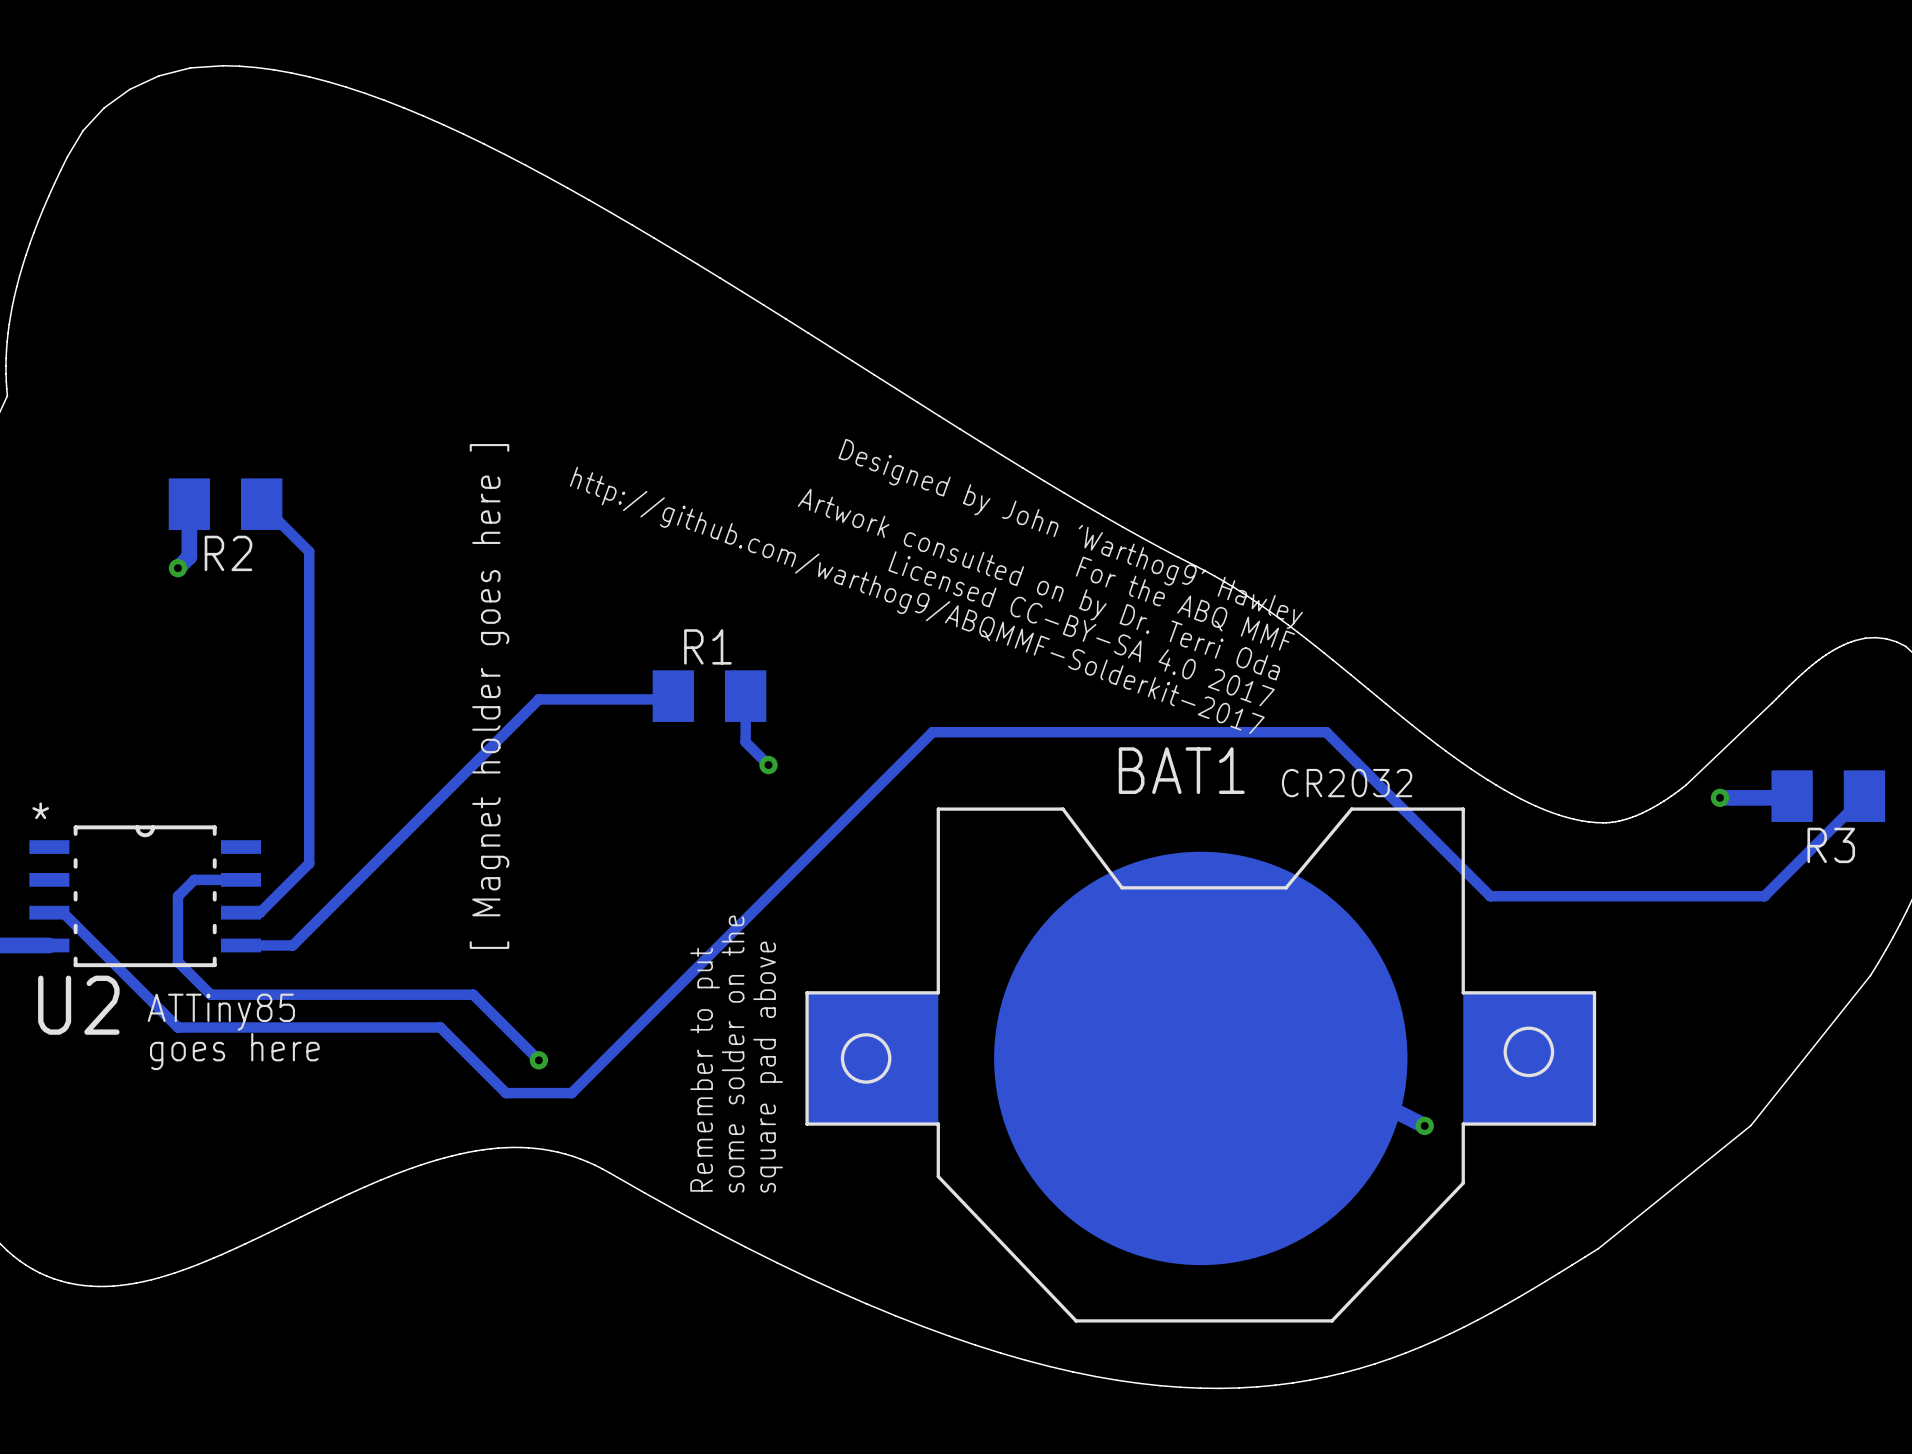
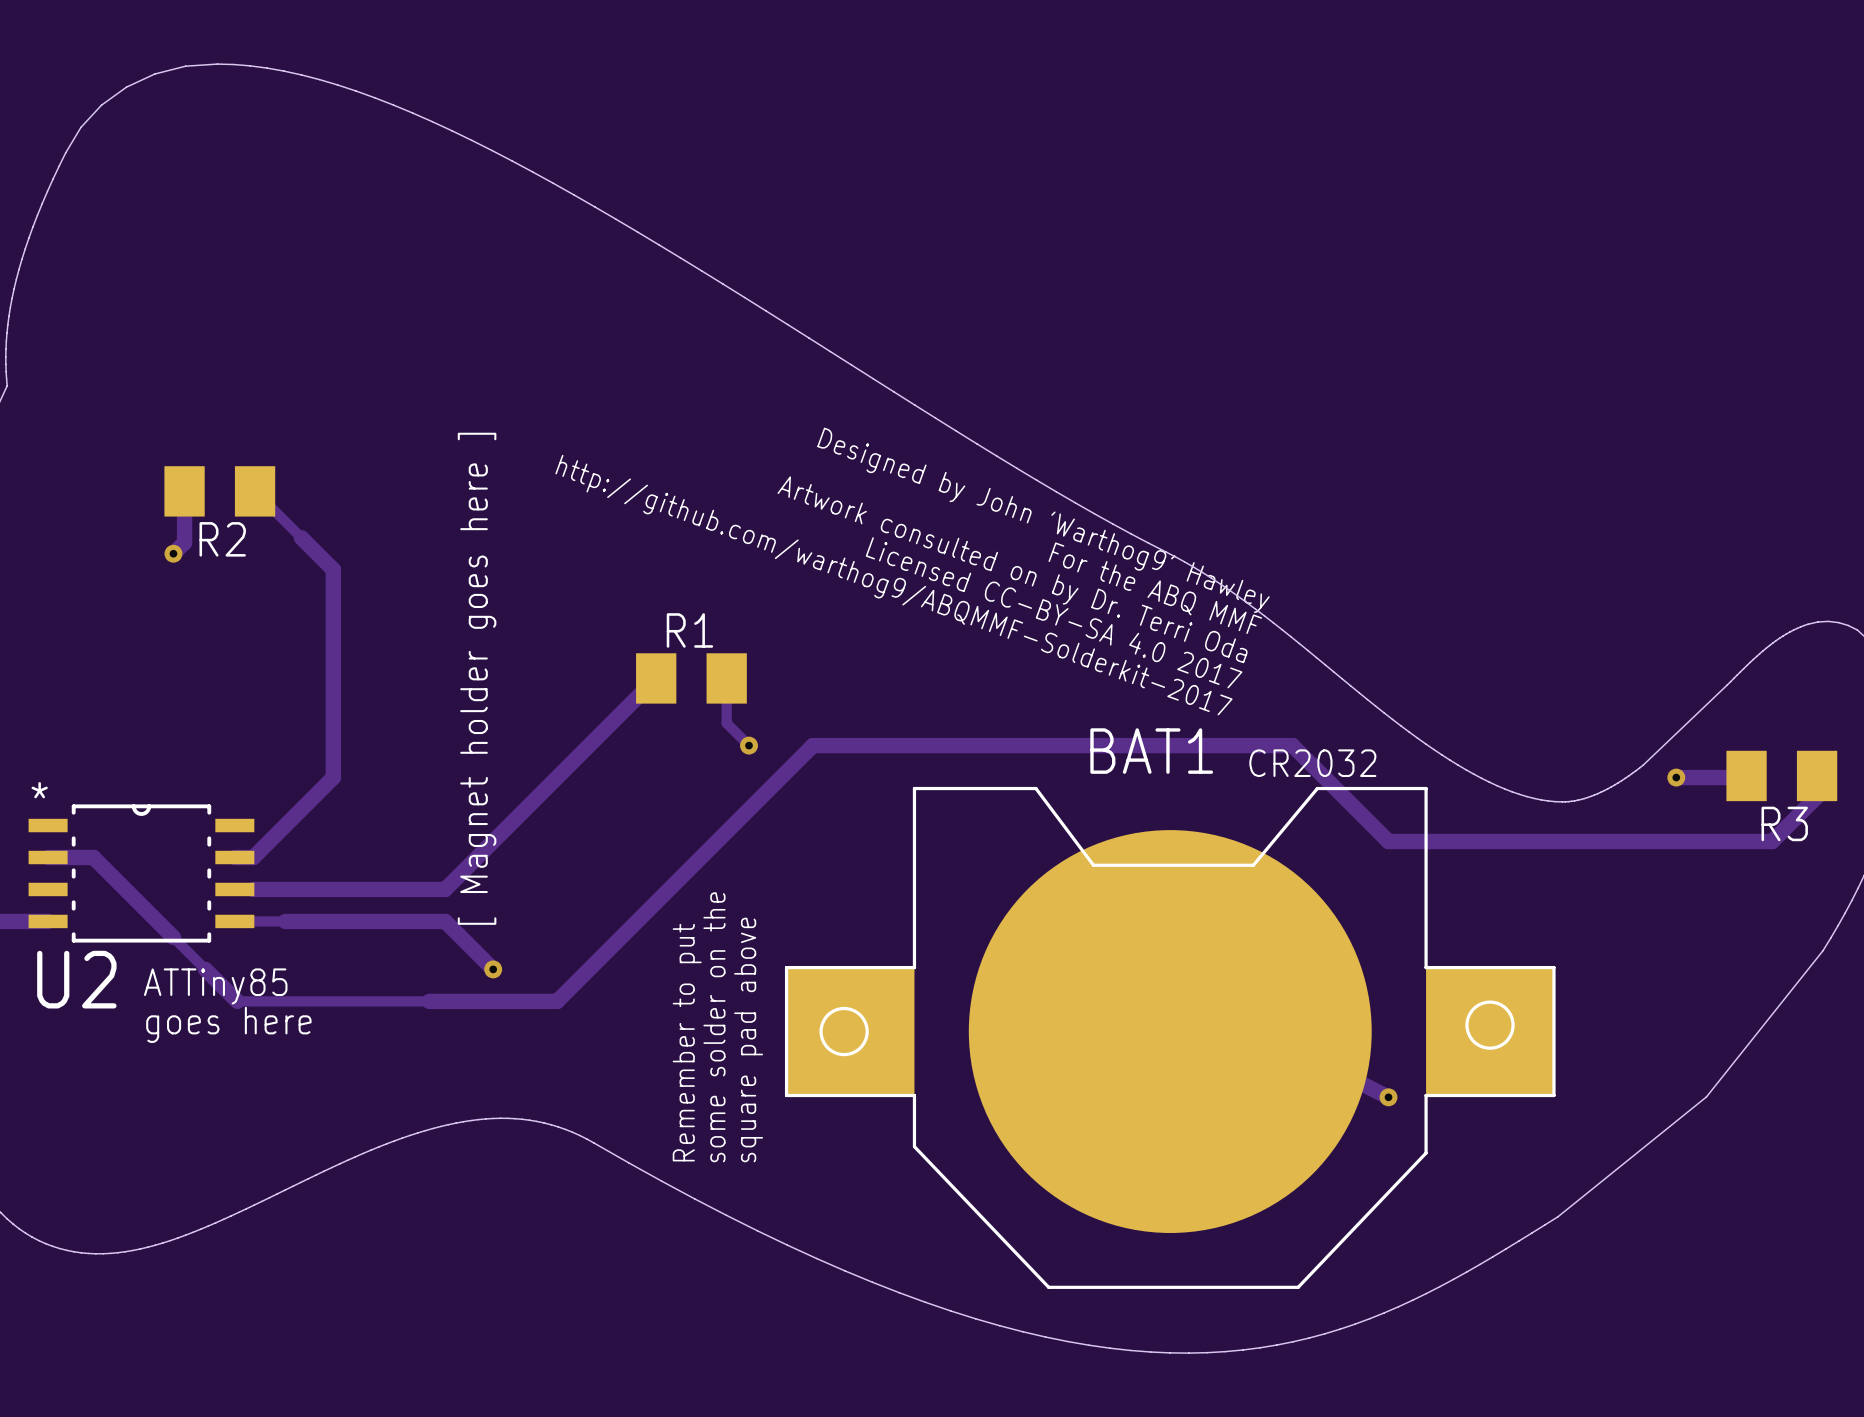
track: (309, 551) (309, 863) (259, 912) -> (301, 537) (333, 569) (333, 777) (253, 857) (234, 857)
track: (670, 699) (538, 699) (292, 945) -> (653, 681) (445, 889) (253, 889)
track: (1864, 796) (1764, 896) (1490, 896) (1326, 732) (932, 732) (571, 1093) (506, 1093) (440, 1027) -> (1817, 775) (1817, 796) (1772, 841) (1388, 841) (1292, 745) (812, 745) (557, 1001) (429, 1001)
track: (240, 879) (194, 879) (177, 896) (177, 961) -> (48, 857) (93, 857) (173, 937)
track: (49, 912) (63, 912) (177, 1027) (243, 1027) -> (205, 969) (237, 1001)
track: none -> (285, 921) (445, 921) (493, 969)
track: (210, 994) (473, 994) (538, 1060) -> none
via position: (538, 1060) -> (493, 969)

